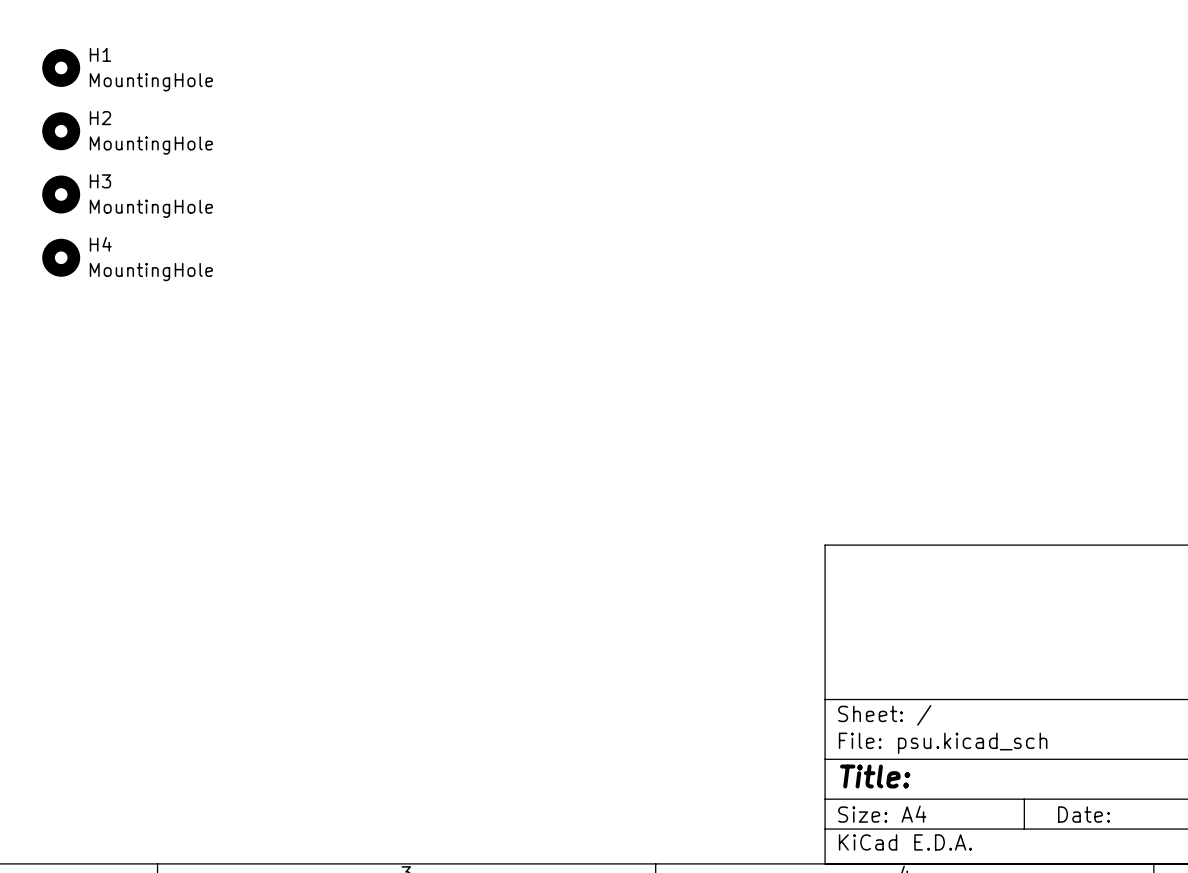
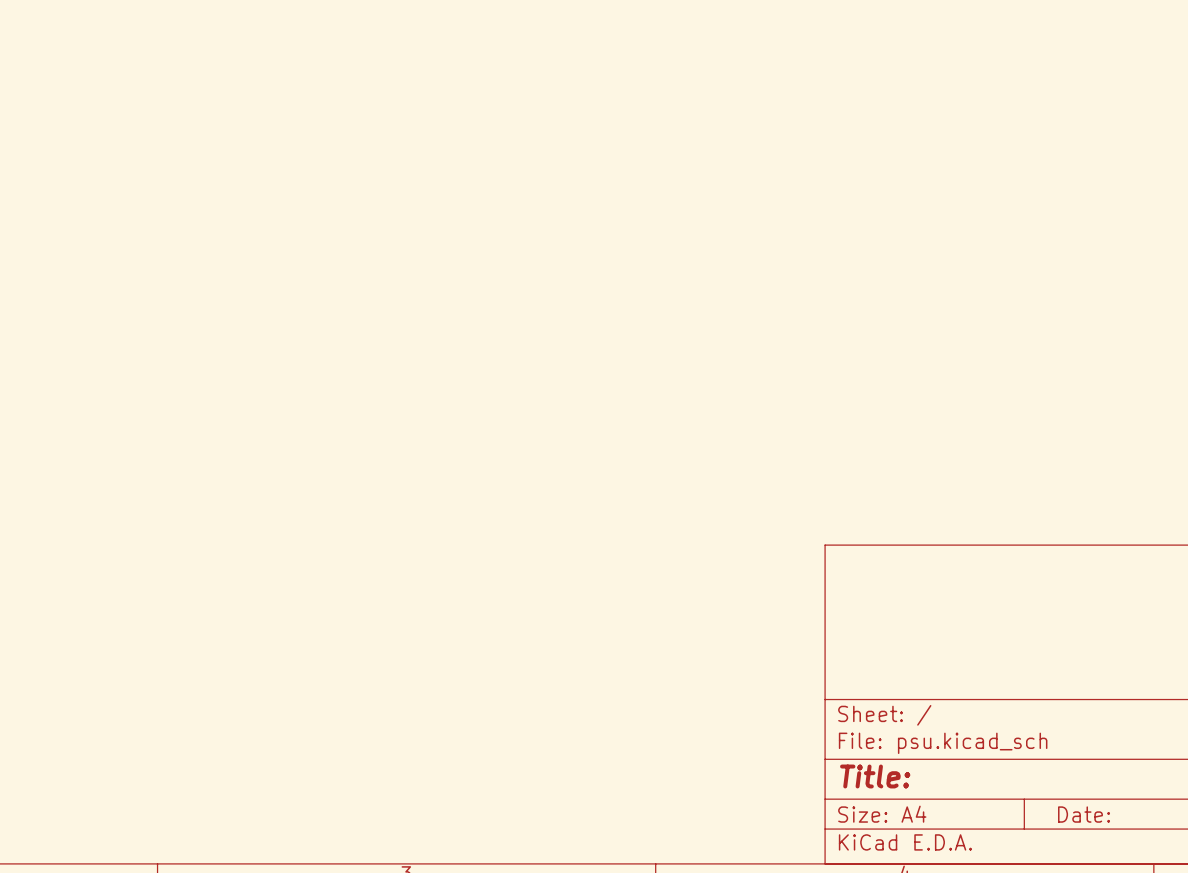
H1: MountingHole (61, 67) -> none
H2: MountingHole (61, 131) -> none
H3: MountingHole (61, 194) -> none
H4: MountingHole (61, 257) -> none

